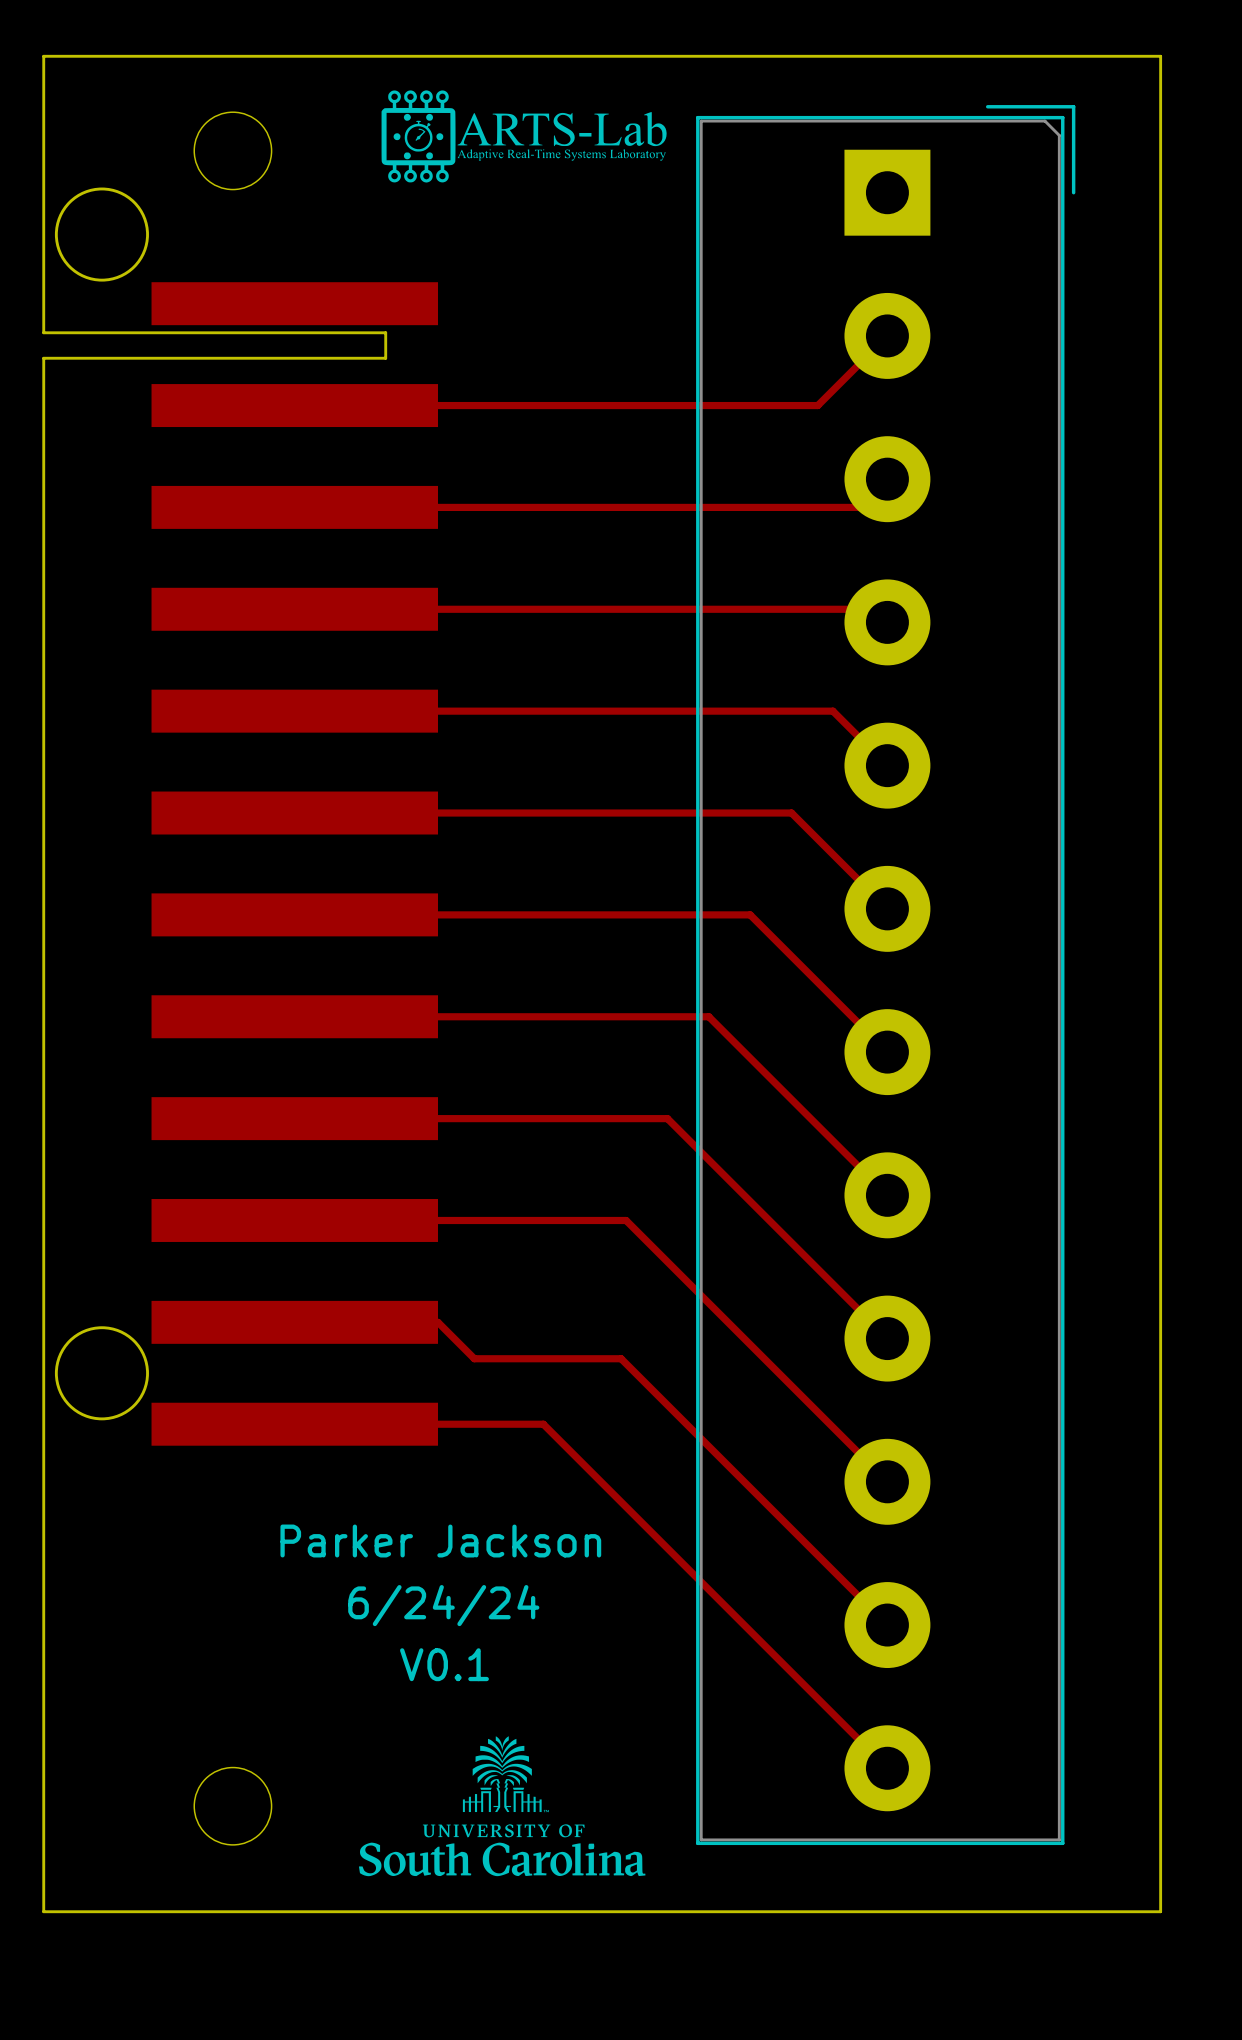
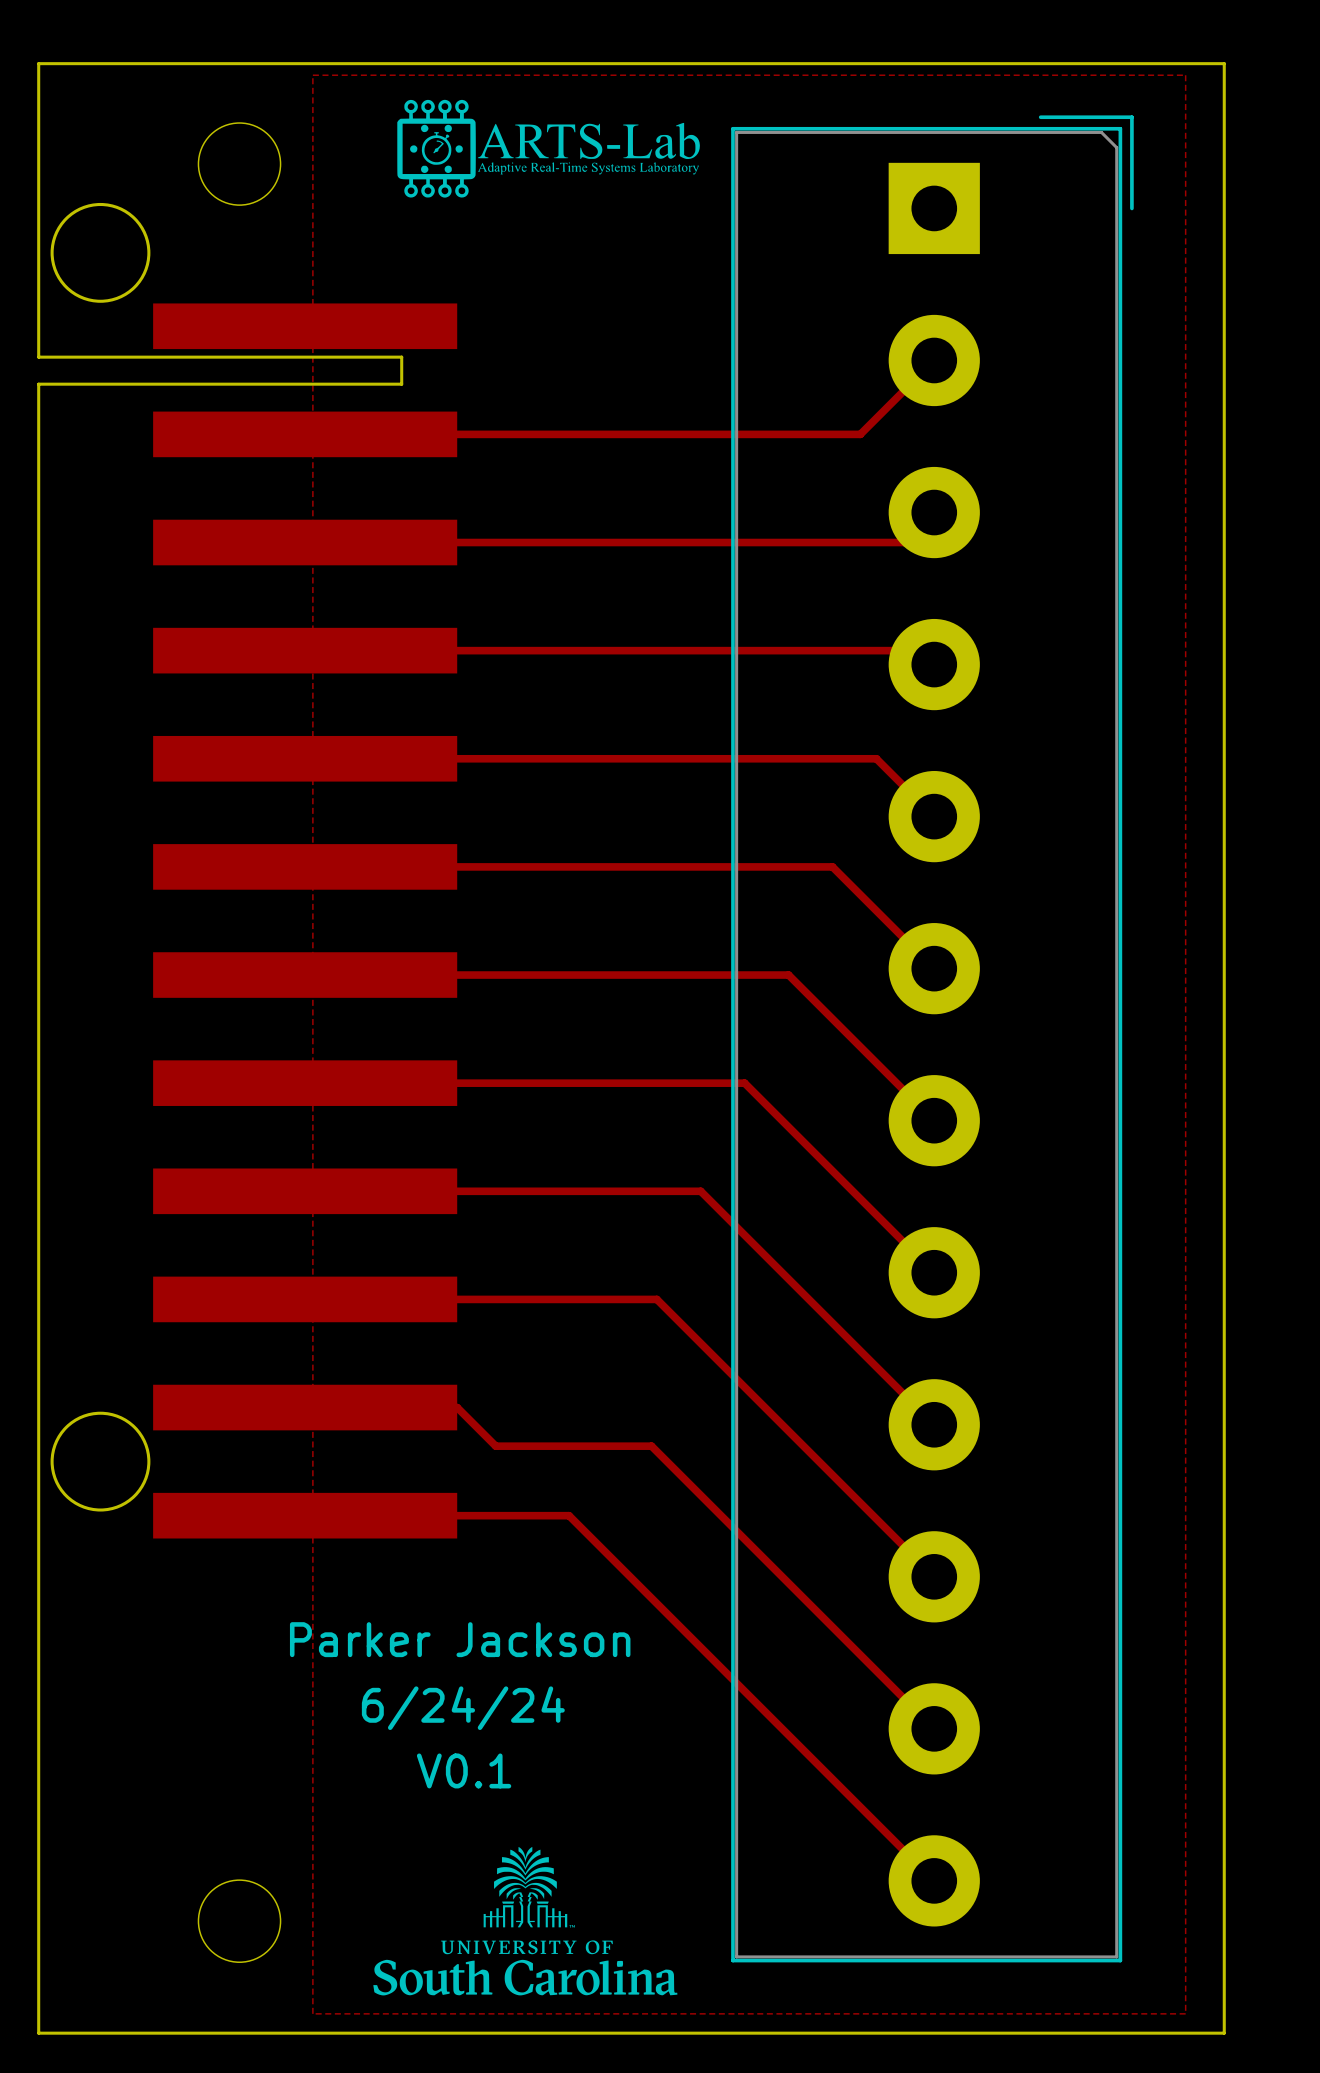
zone outline: none -> (312, 75) (1185, 75) (1185, 2013) (312, 2013) (312, 75)

